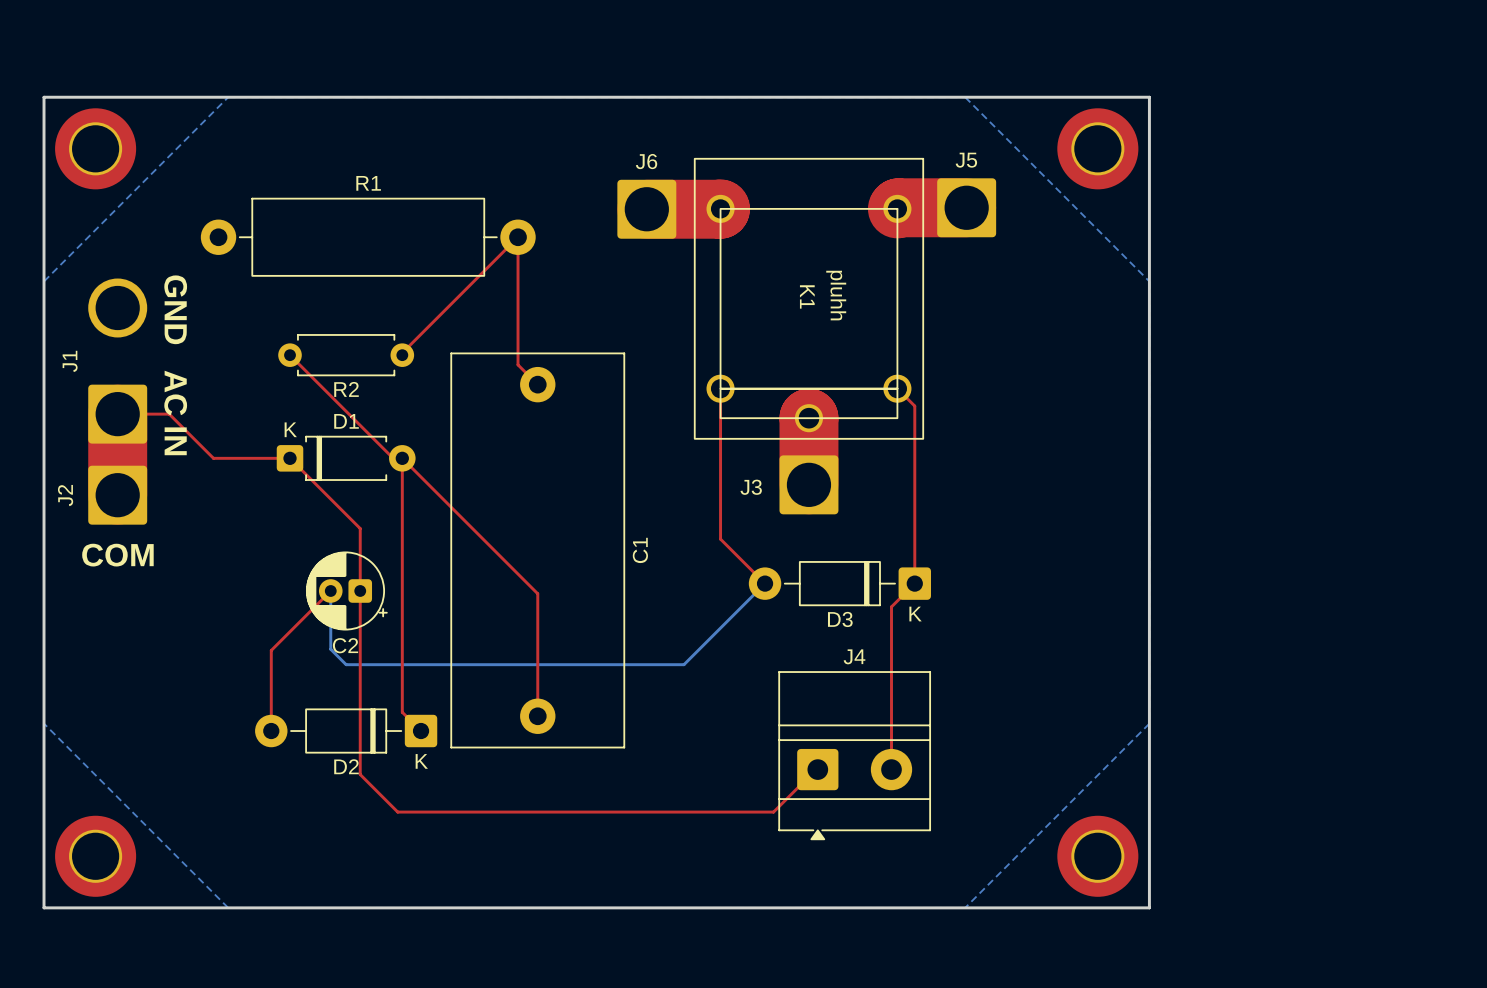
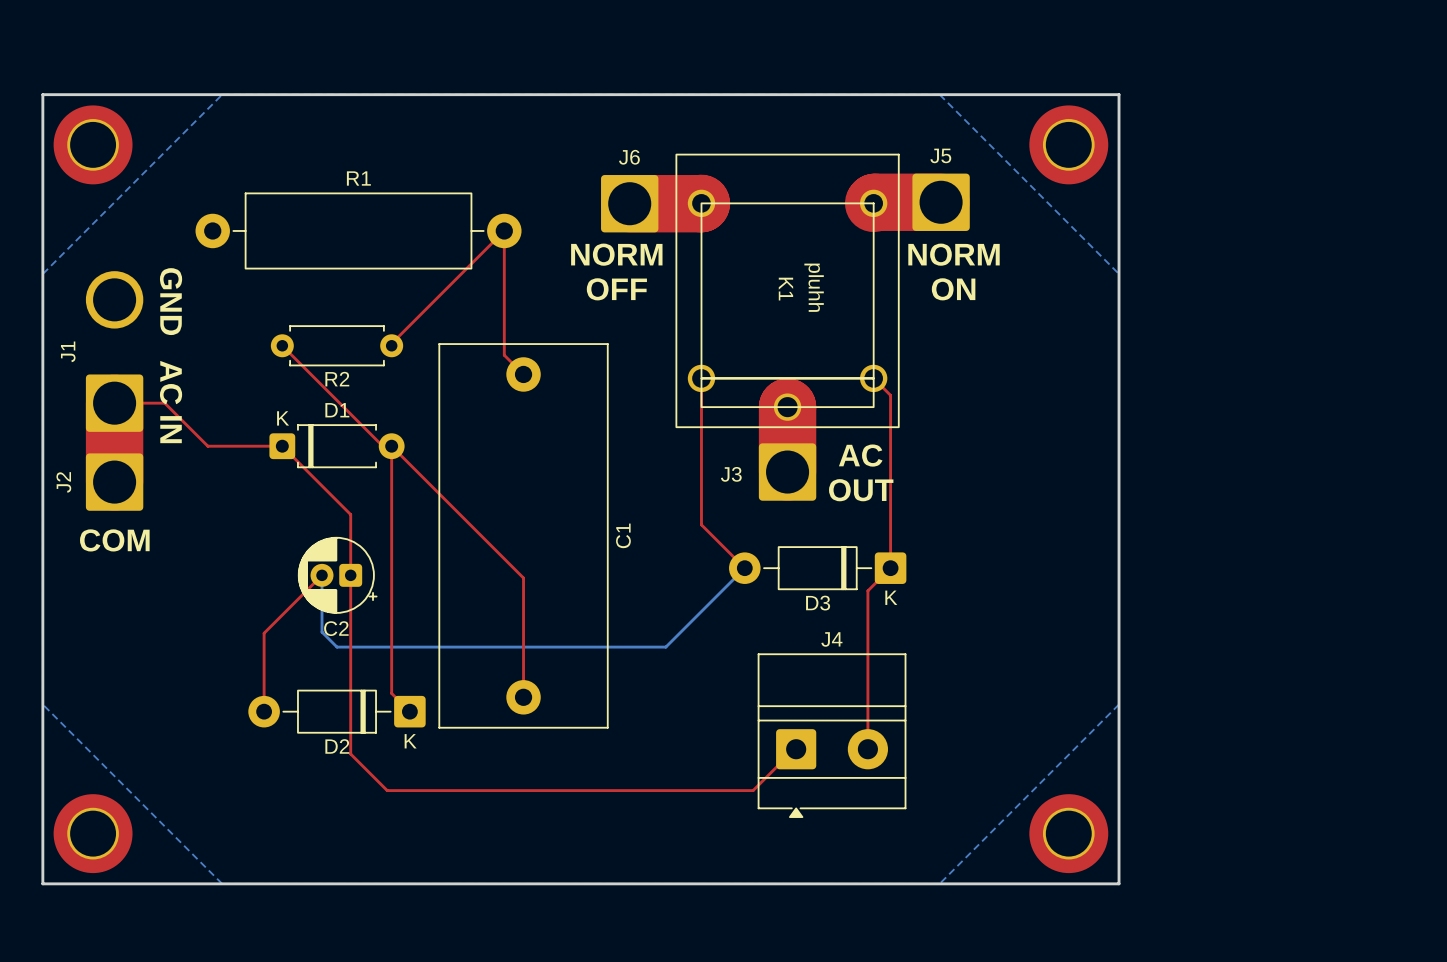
text: none -> NORM (616, 254)
text: none -> NORM (954, 254)
text: none -> OFF (616, 289)
text: none -> ON (953, 289)
text: none -> AC (860, 455)
text: none -> OUT (861, 490)

